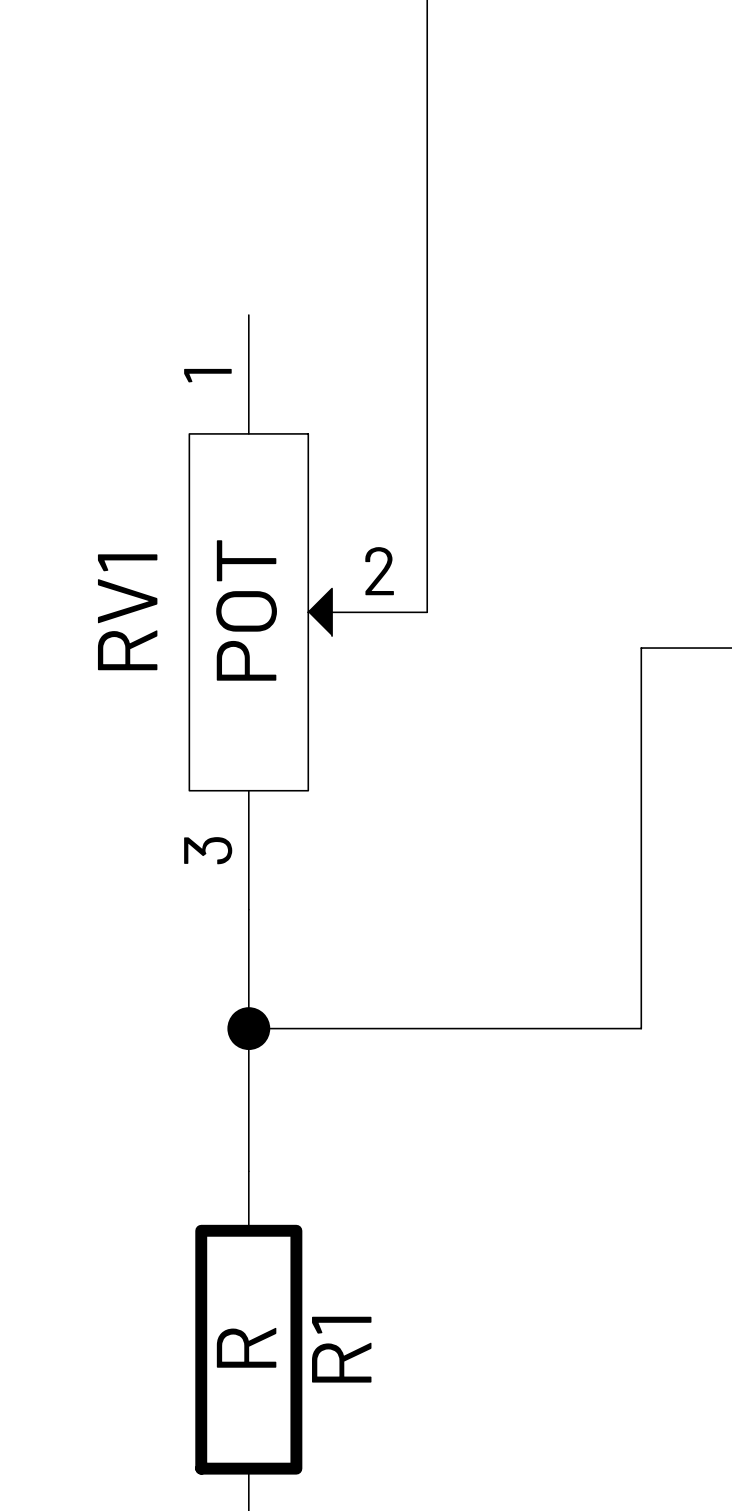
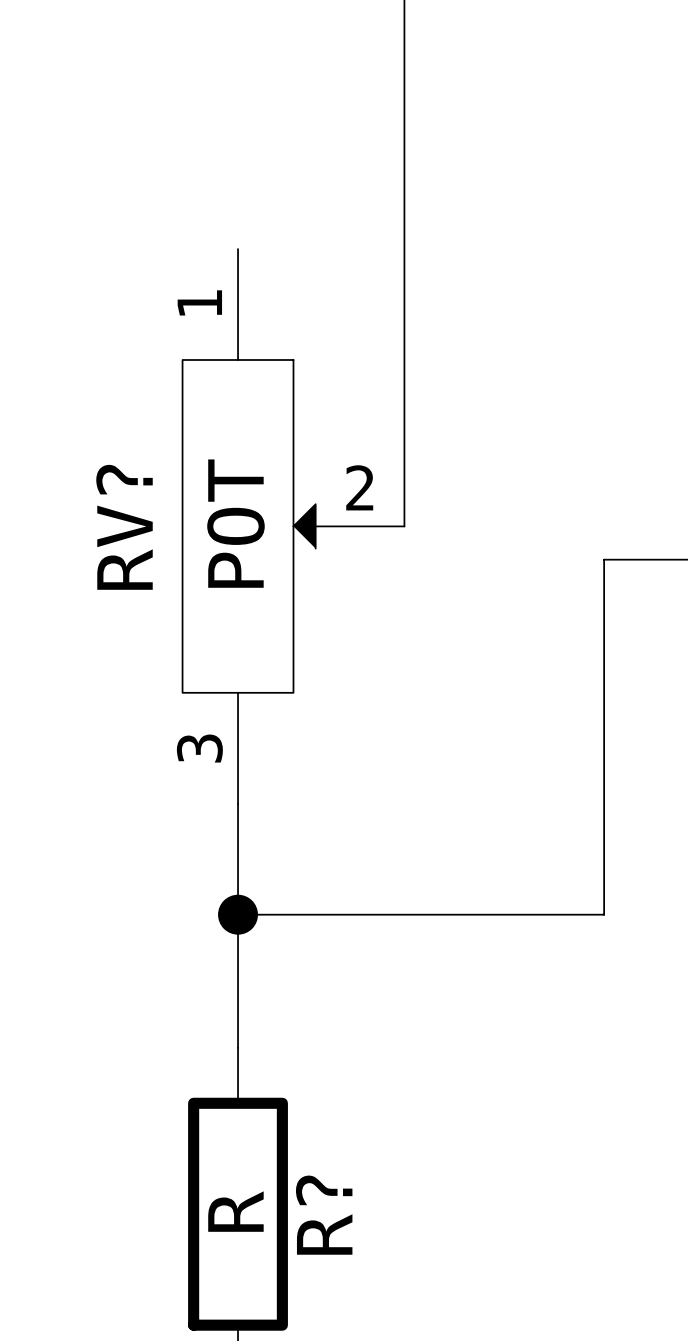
RV1 name: RV1 (127, 612) -> RV? (124, 527)
R1 name: R1 (341, 1349) -> R? (324, 1215)

